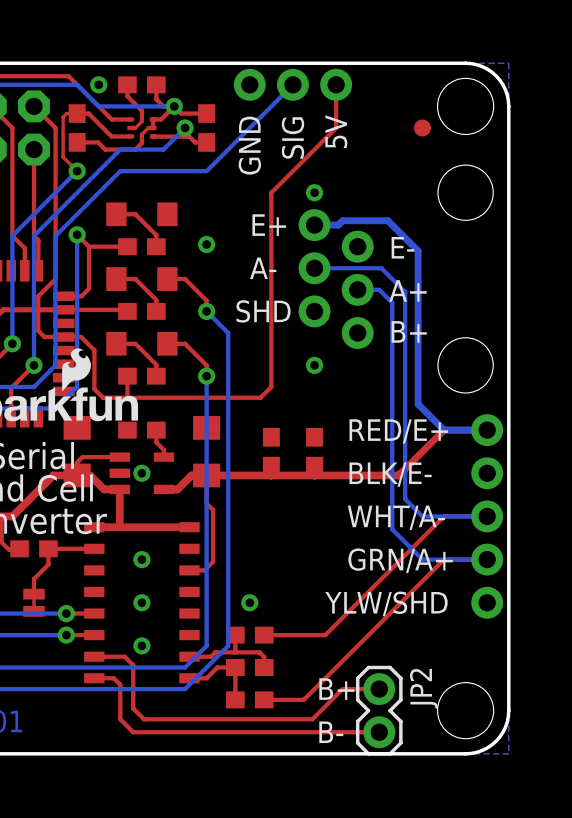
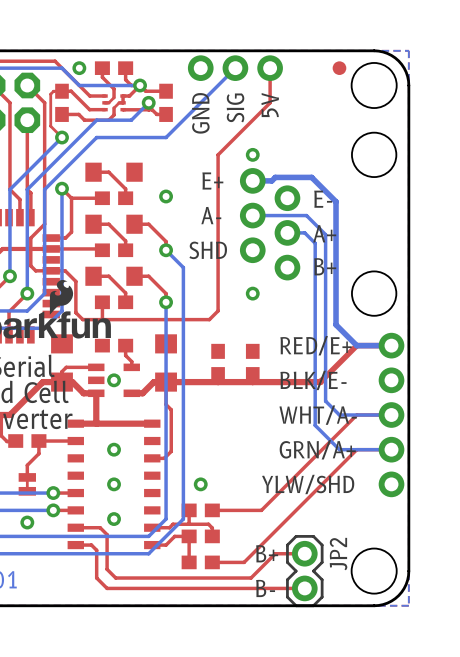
part position: (422, 127) -> (339, 68)
via: none -> (27, 522)

